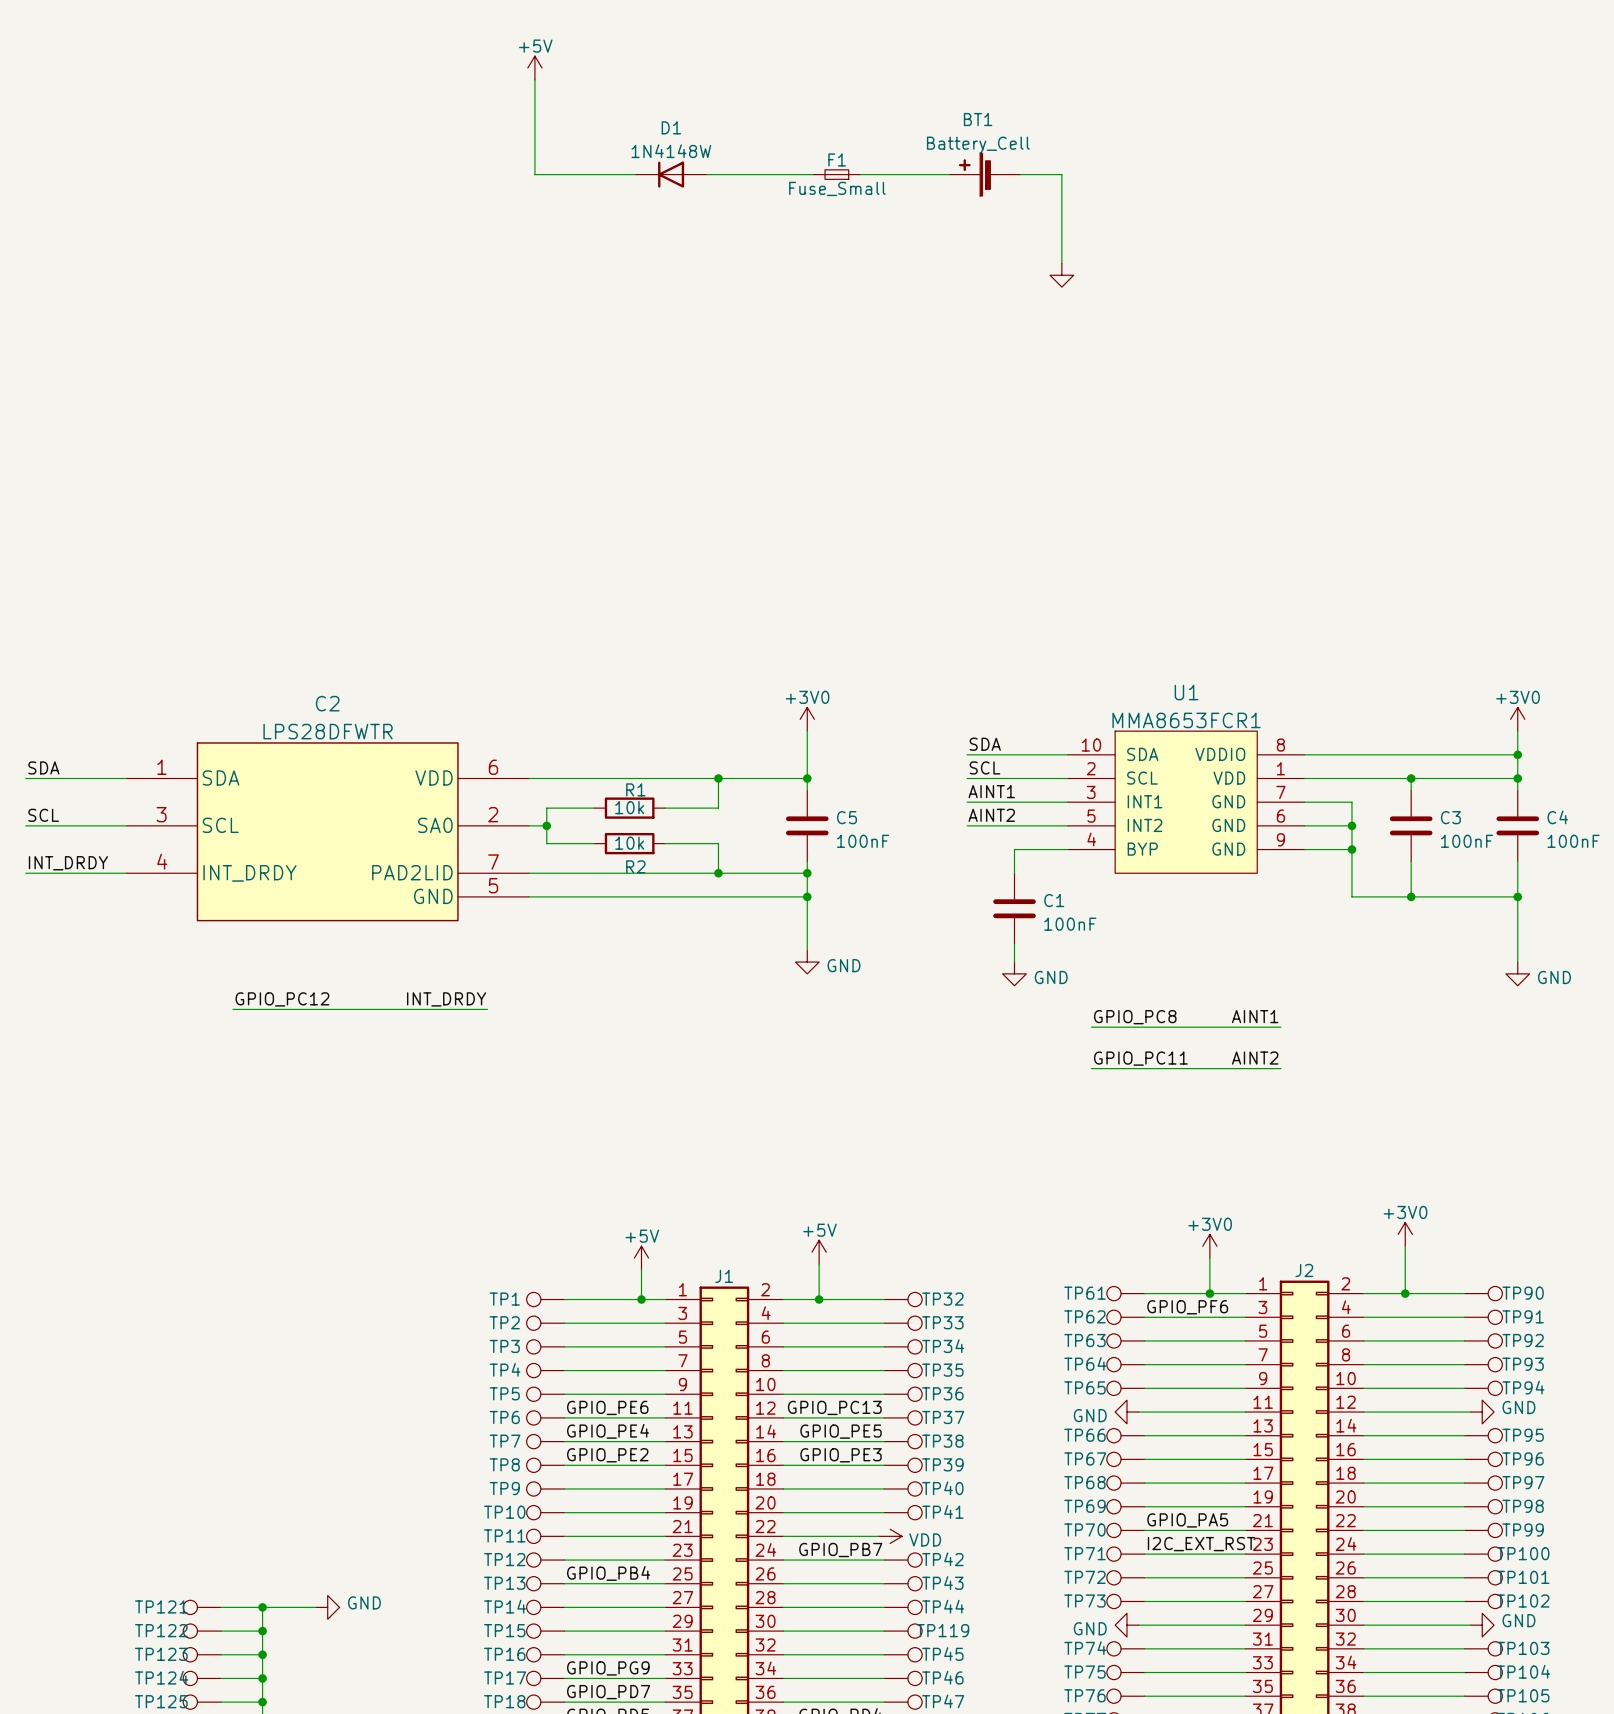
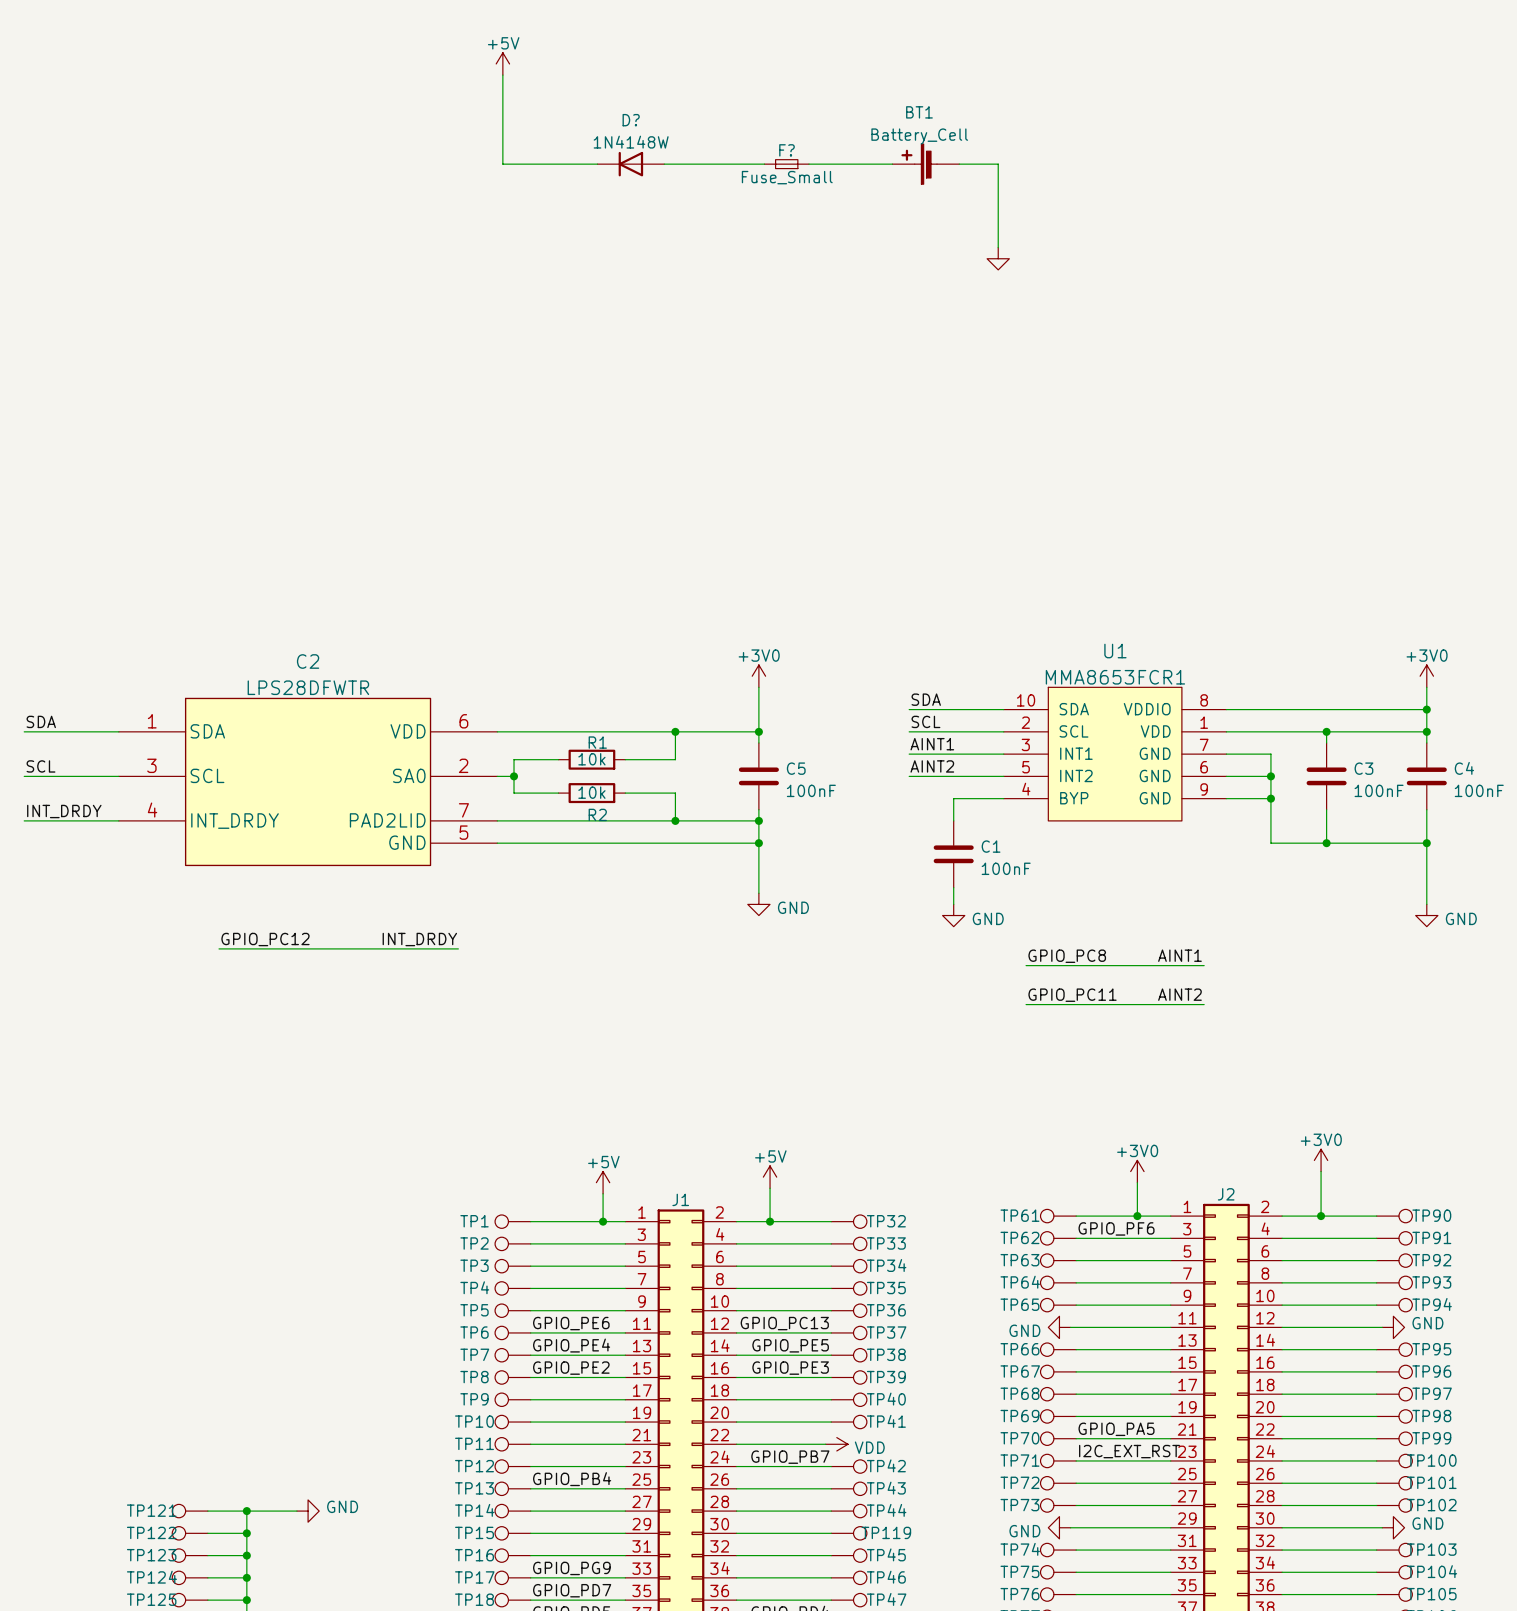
D1 name: D1 (671, 127) -> D? (631, 120)
F1 name: F1 (837, 159) -> F? (786, 150)

